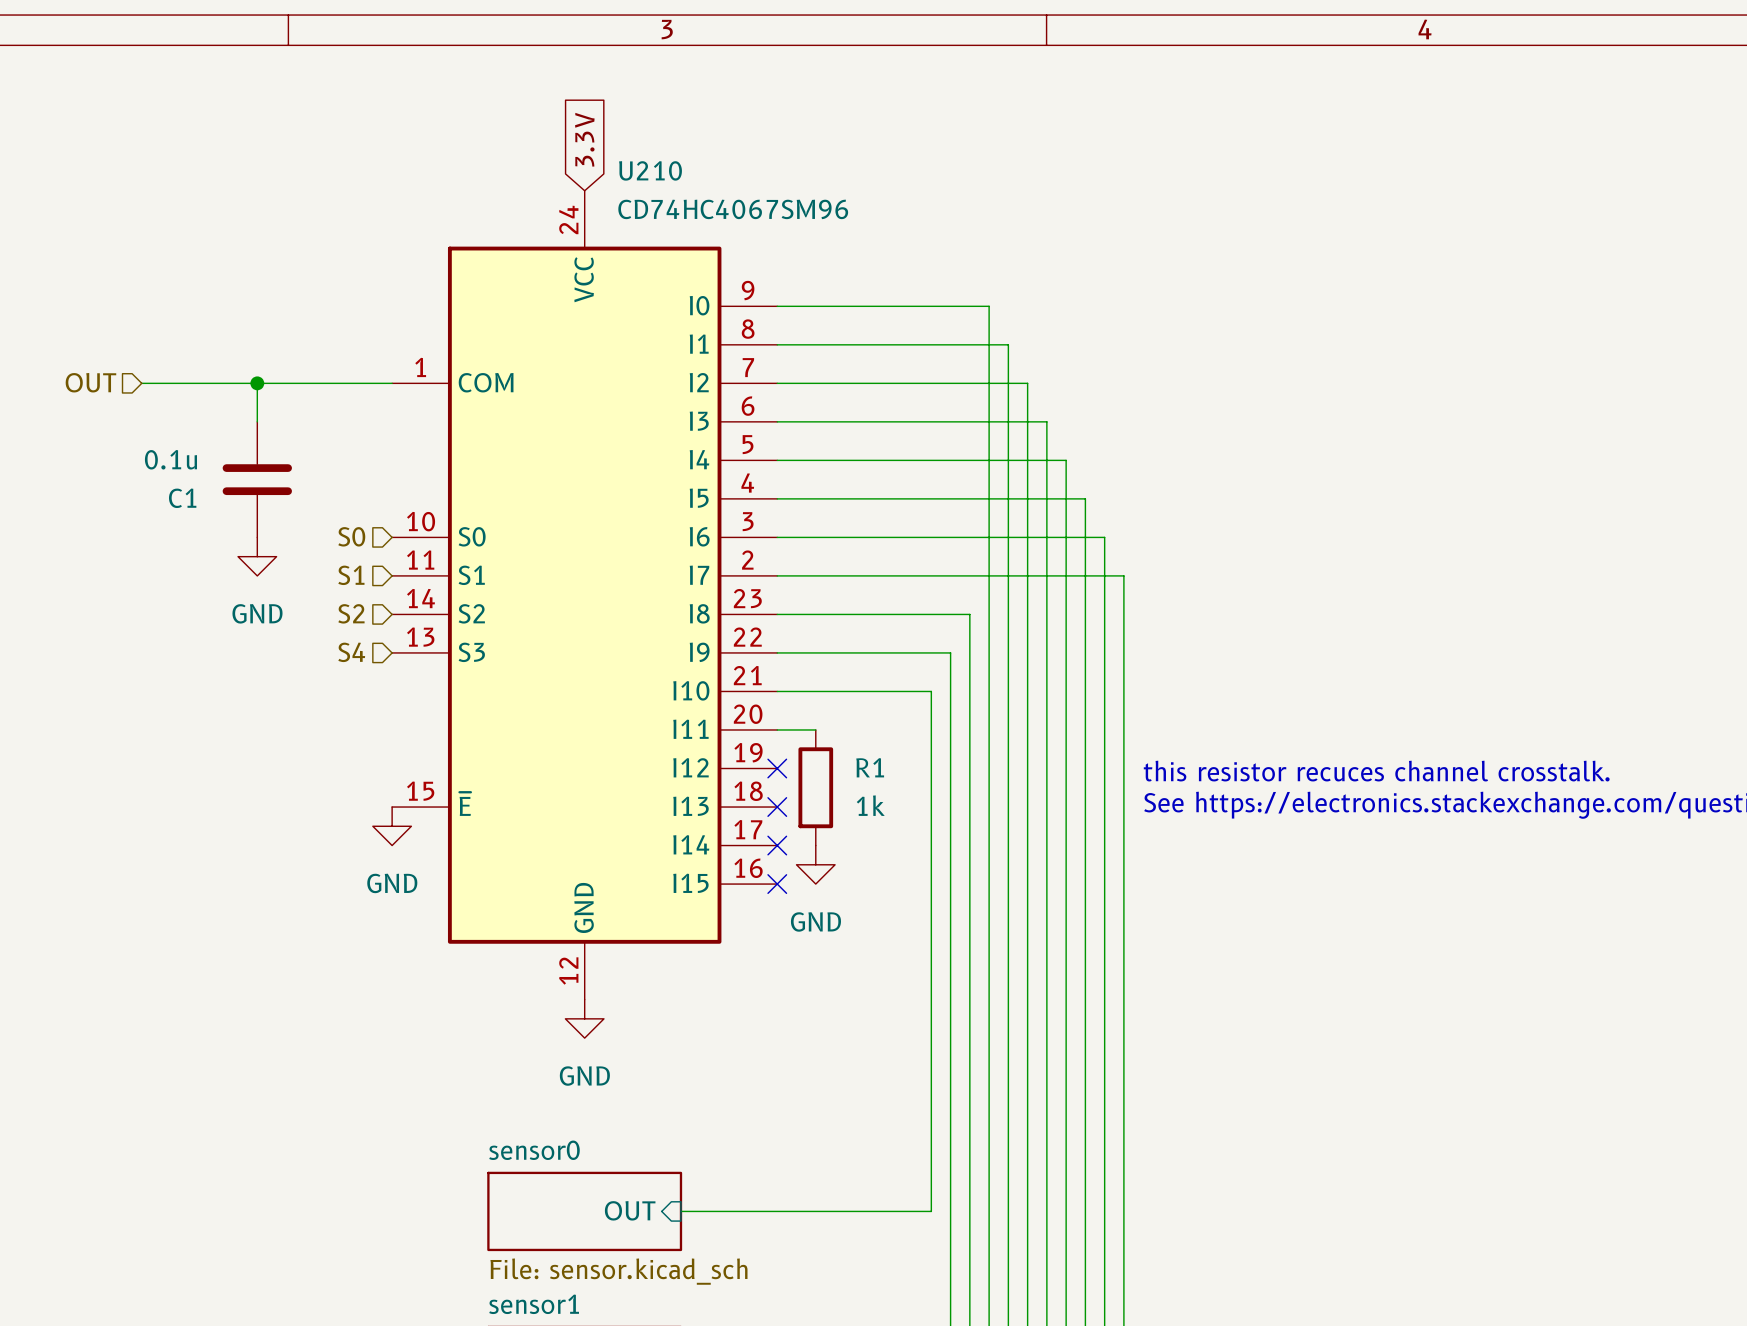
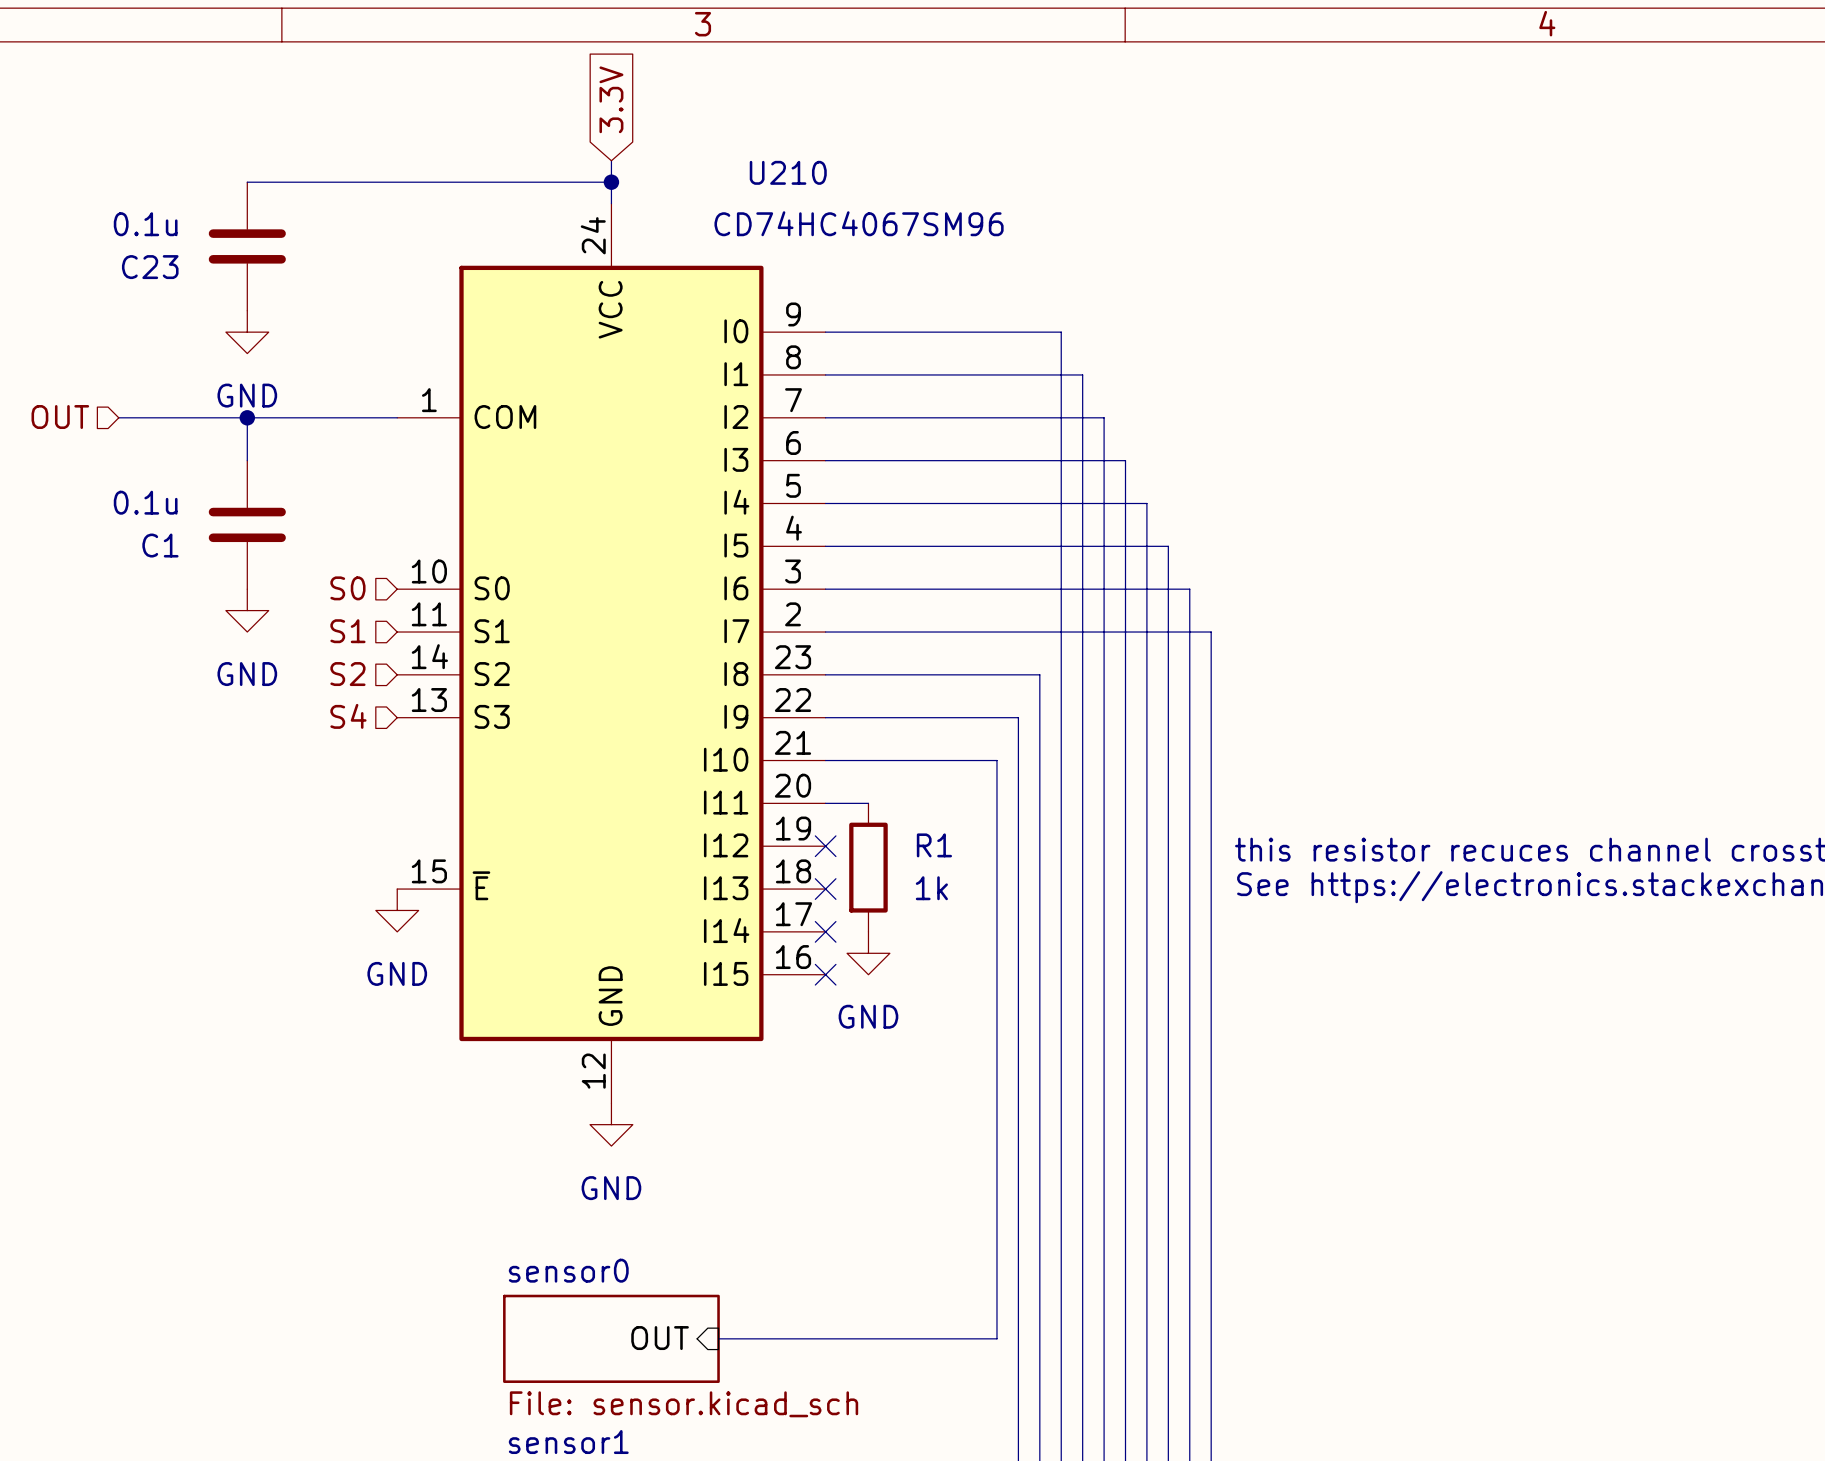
global label position: 3.3V (584, 139) -> 3.3V (611, 99)
wire: none -> (611, 160) (611, 203)
U210 name position: U210 (650, 170) -> U210 (788, 172)
wire: none -> (247, 182) (611, 182)
junction: none -> (611, 182)
U210 value position: CD74HC4067SM96 (733, 209) -> CD74HC4067SM96 (859, 223)
C23: none -> 0.1u (247, 246)
power symbol: none -> GND (247, 332)

